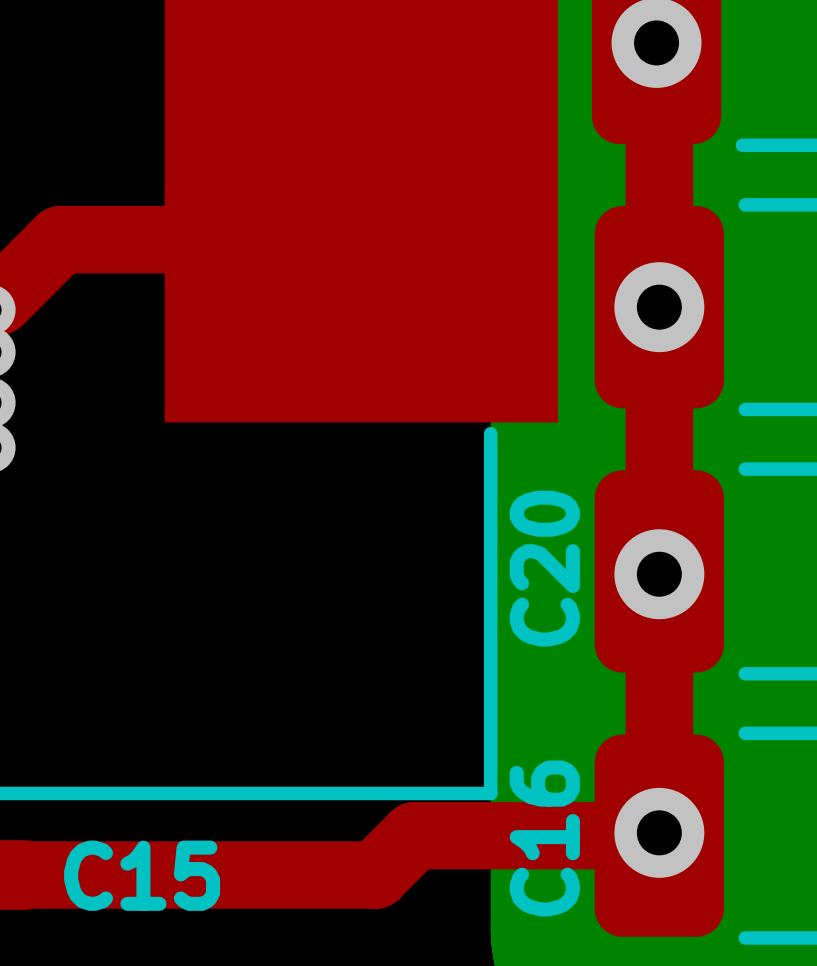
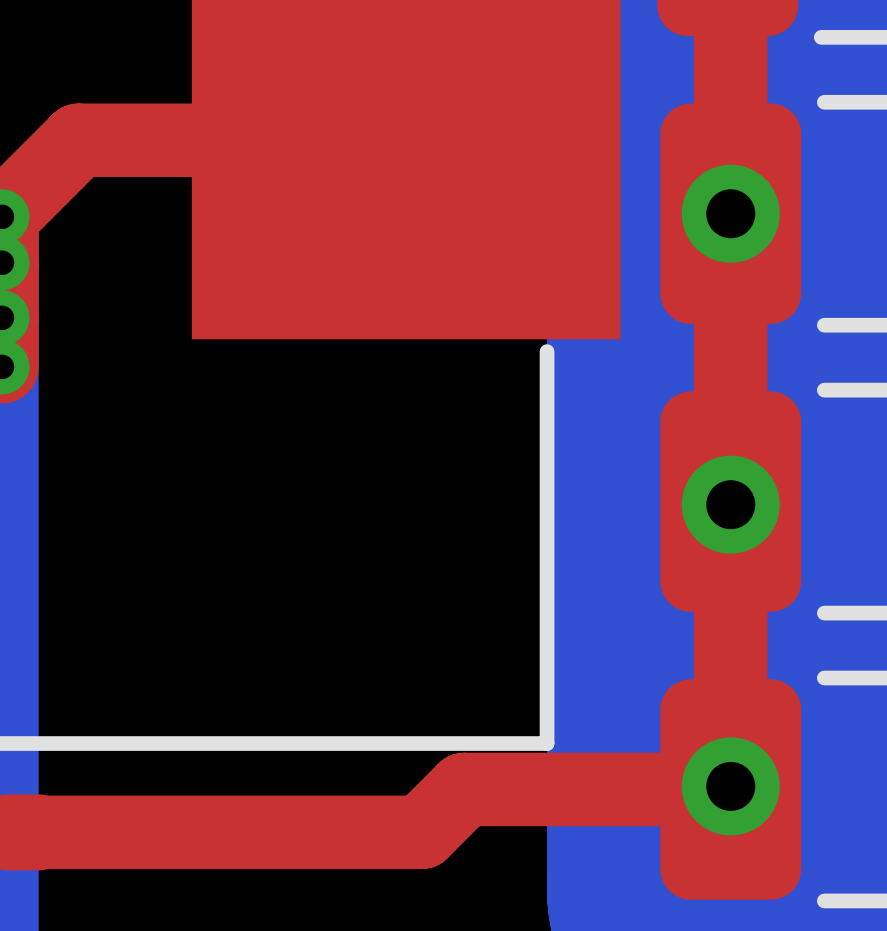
C20 name: C20 (544, 568) -> none
C16 name: C16 (544, 838) -> none
C15 name: C15 (142, 875) -> none

